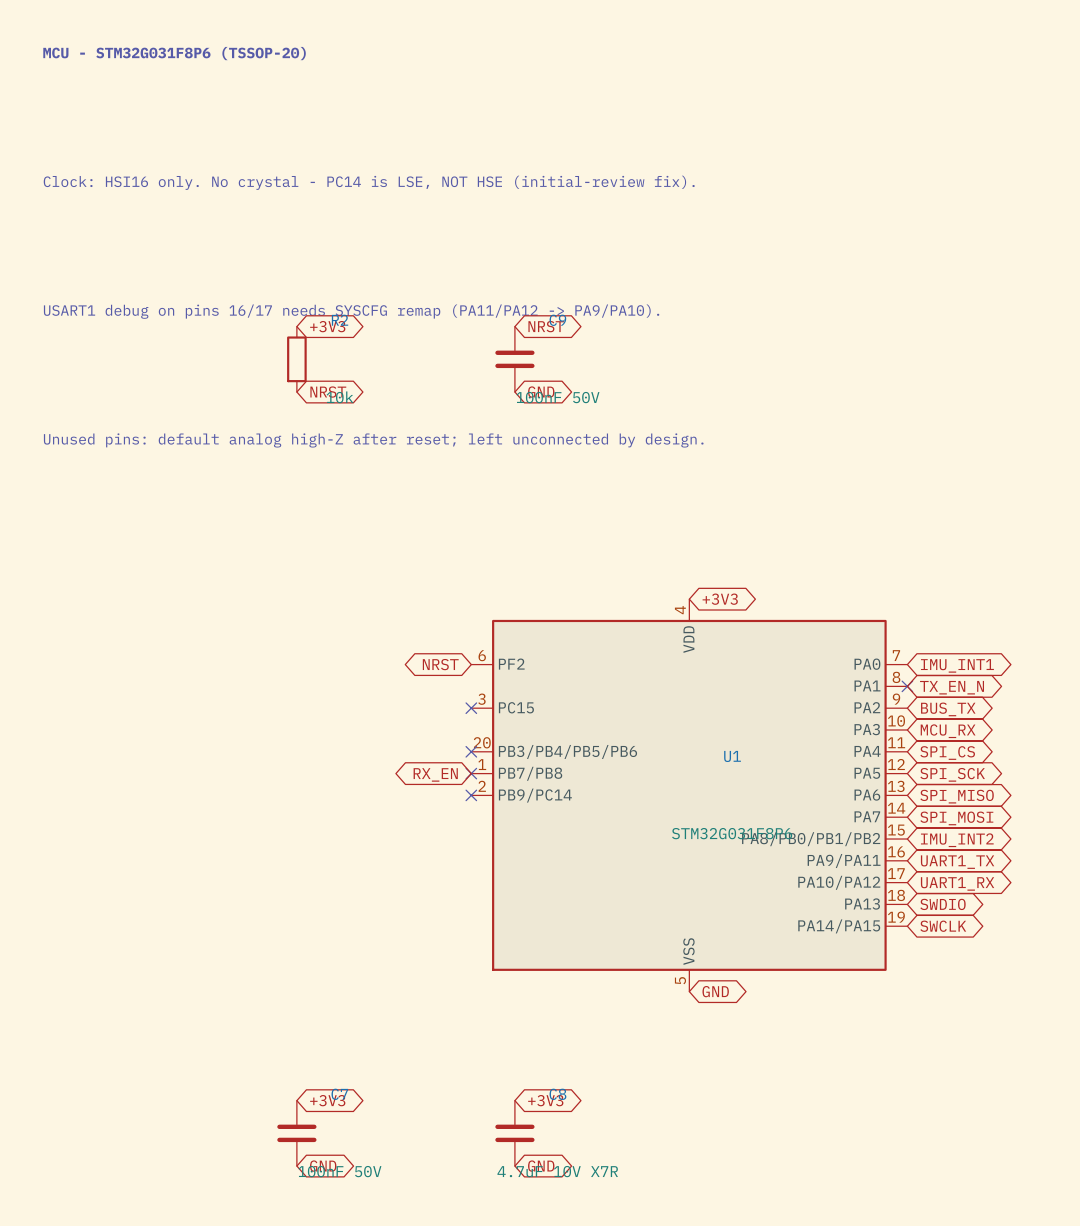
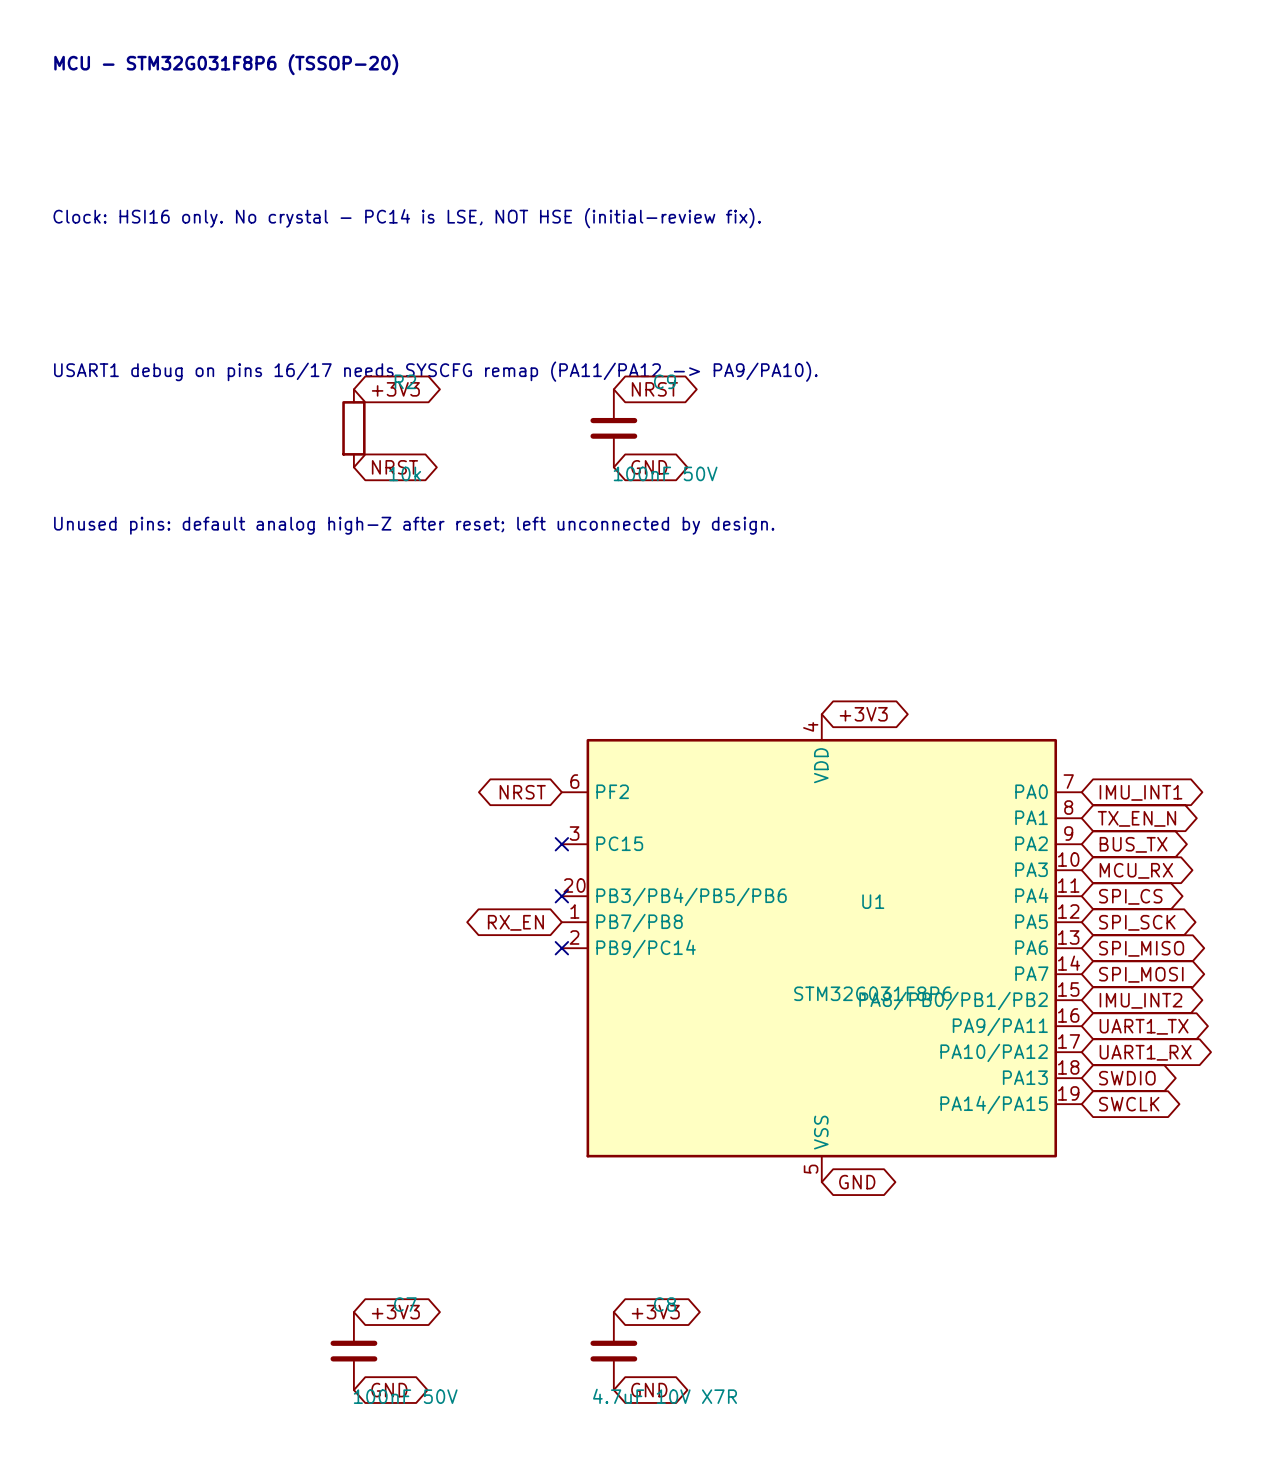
no-connect mark: (907, 686) -> none
no-connect mark: (471, 773) -> none

